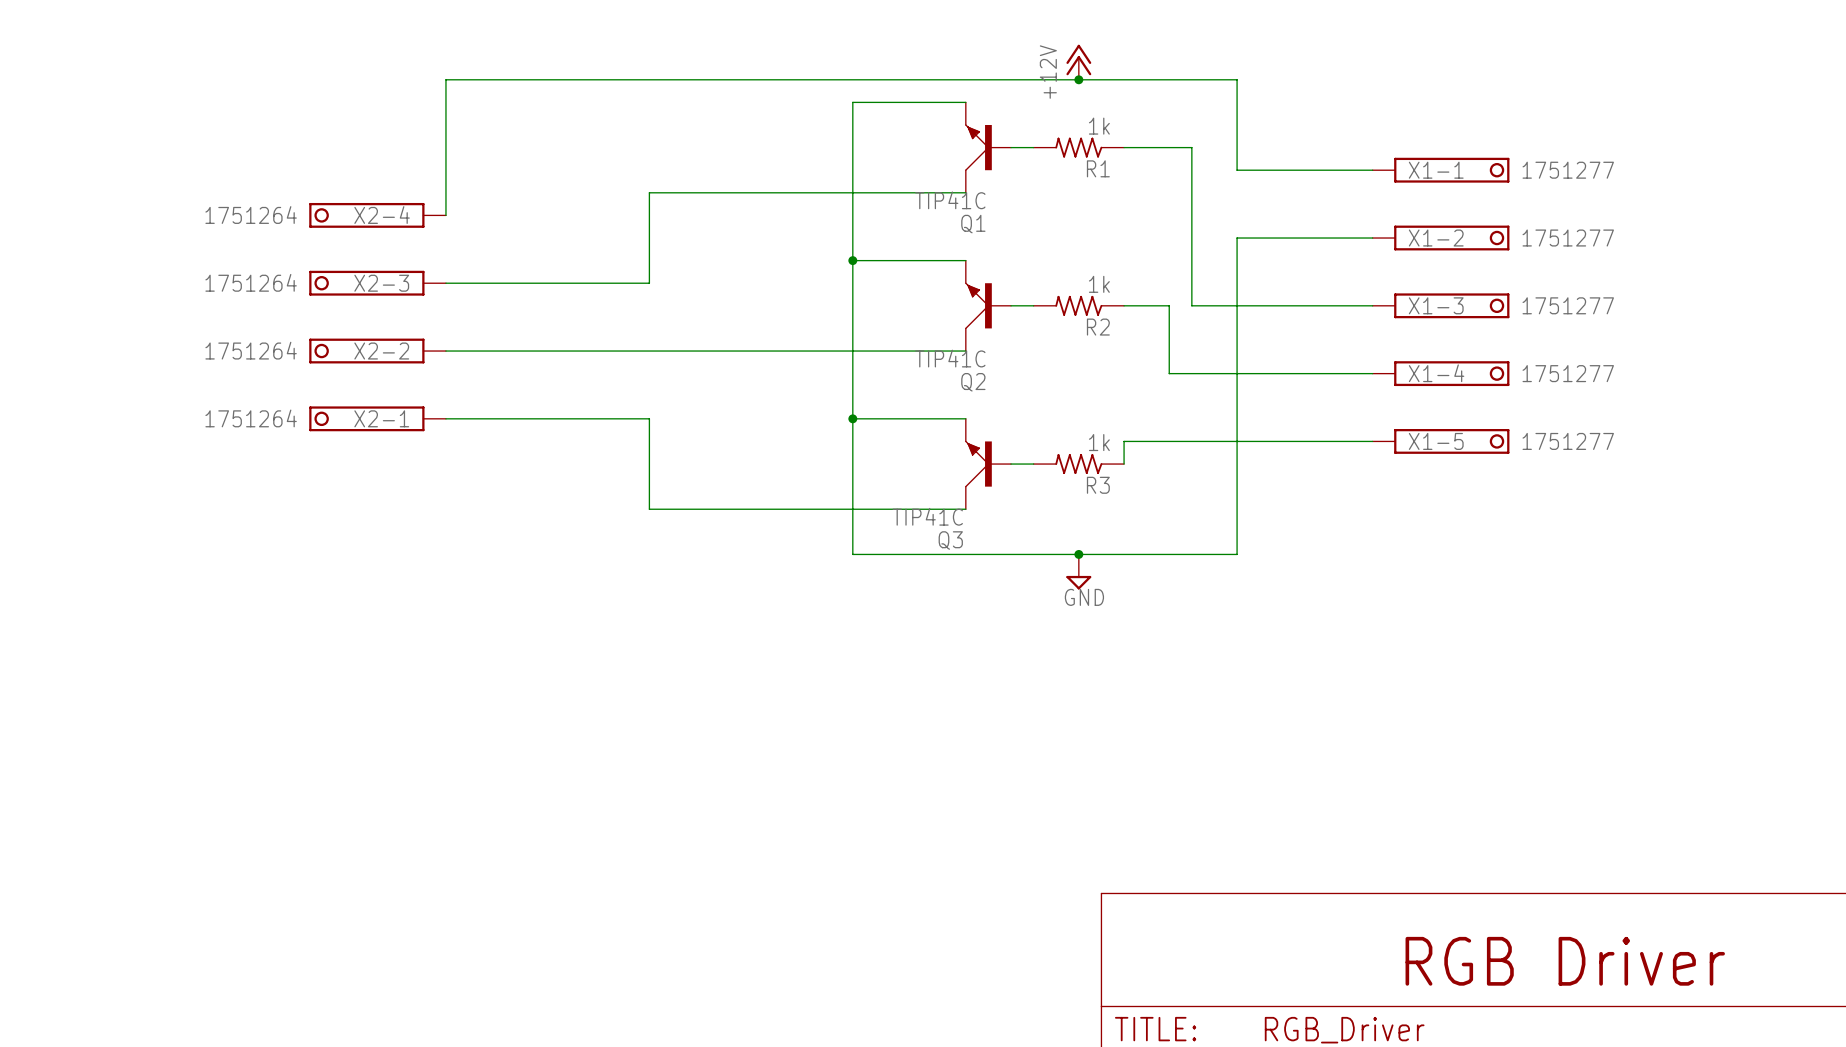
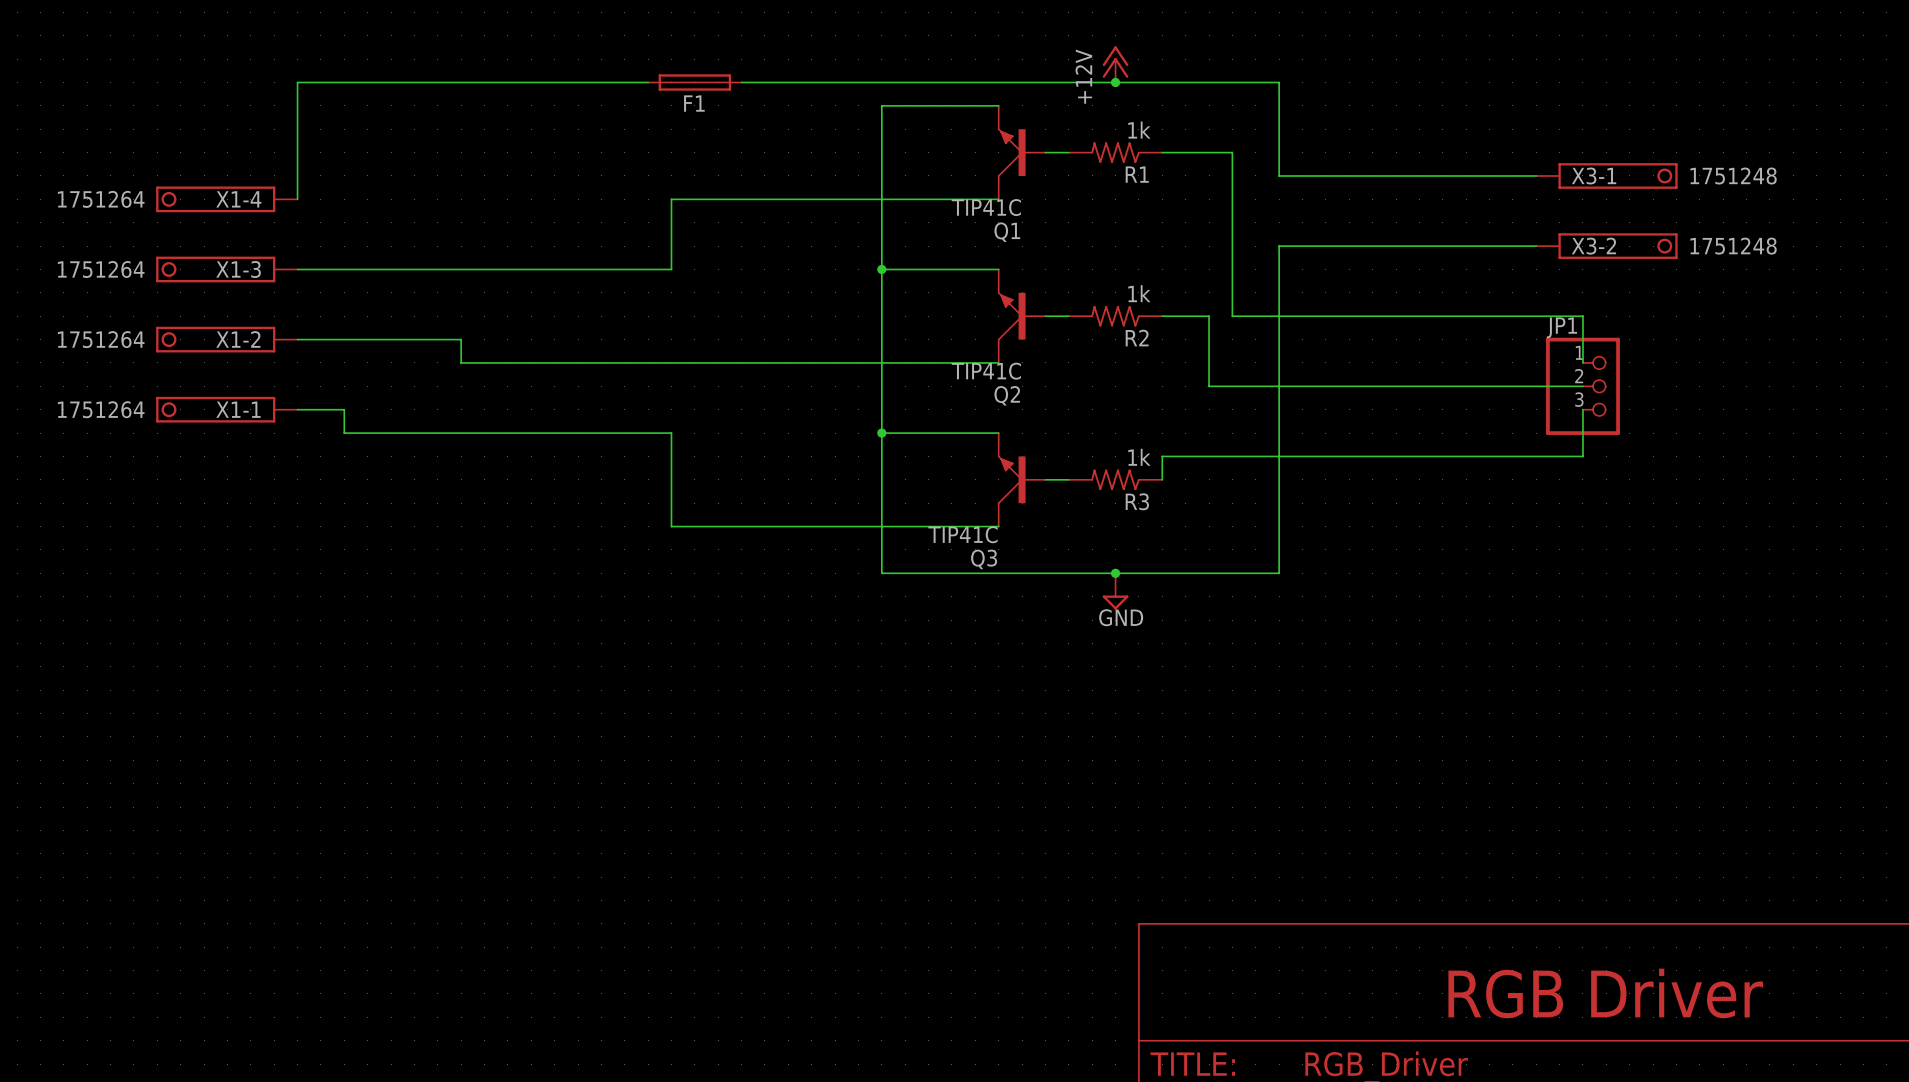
wire: (445, 79) (445, 215) -> (461, 82) (297, 82) (297, 199)
F1: none -> (694, 82)
wire: none -> (1419, 175) (1536, 175)
X1-1 position: (1441, 170) -> (226, 409)
X1-1 rotation: 0° (1451, 170) -> 180° (215, 409)
X3-1: none -> 1751248 (1606, 175)
X1-1 value: 1751277 (1568, 170) -> 1751264 (101, 409)
X2-4: 1751264 (377, 215) -> none
wire: none -> (1419, 246) (1536, 246)
X1-2 position: (1441, 238) -> (226, 339)
X1-2 rotation: 0° (1451, 238) -> 180° (215, 339)
X3-2: none -> 1751248 (1606, 246)
X1-2 value: 1751277 (1568, 238) -> 1751264 (101, 339)
wire: (649, 260) (649, 283) (445, 283) -> (671, 269) (297, 269)
X2-3: 1751264 (377, 283) -> none
wire: none -> (1419, 316) (1582, 316) (1582, 362)
X1-3 position: (1441, 305) -> (226, 269)
X1-3 rotation: 0° (1451, 305) -> 180° (215, 269)
X1-3 value: 1751277 (1568, 305) -> 1751264 (101, 269)
wire: none -> (297, 339) (461, 339) (461, 362)
X2-2: 1751264 (377, 351) -> none
wire: none -> (1419, 386) (1582, 386)
X1-4 position: (1441, 373) -> (226, 199)
X1-4 rotation: 0° (1451, 373) -> 180° (215, 199)
JP1: none -> (1582, 386)
X1-4 value: 1751277 (1568, 373) -> 1751264 (101, 199)
wire: none -> (297, 409) (344, 409) (344, 433) (461, 433)
wire: none -> (1582, 409) (1582, 456) (1419, 456)
X2-1: 1751264 (377, 418) -> none
X1-5: 1751277 (1441, 441) -> none

